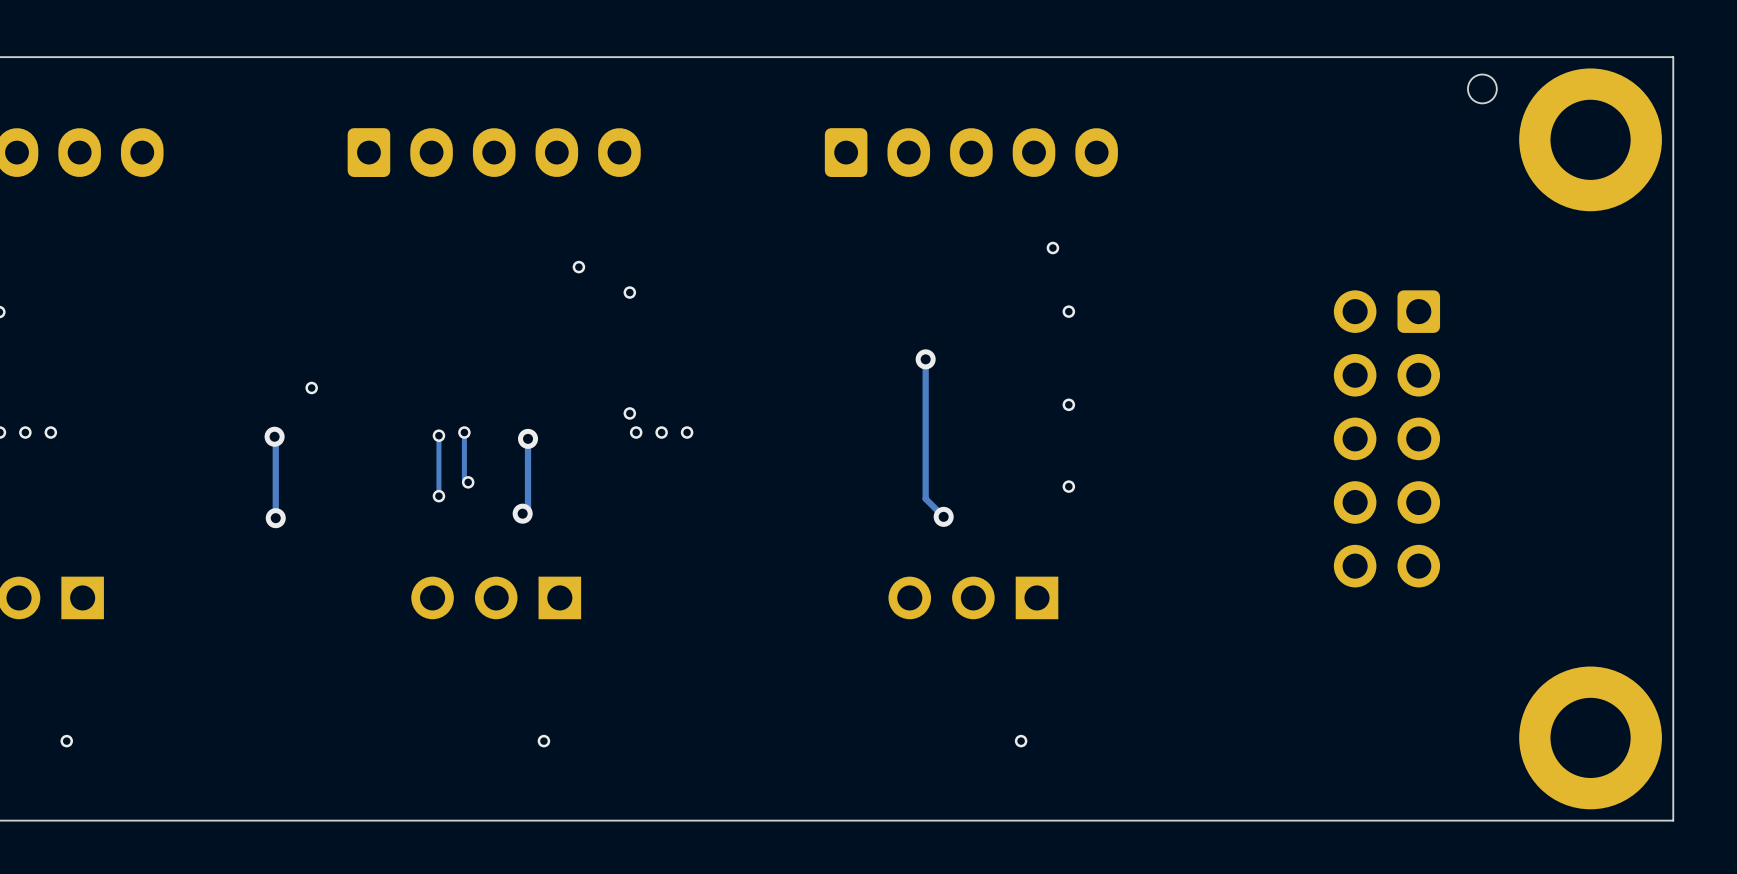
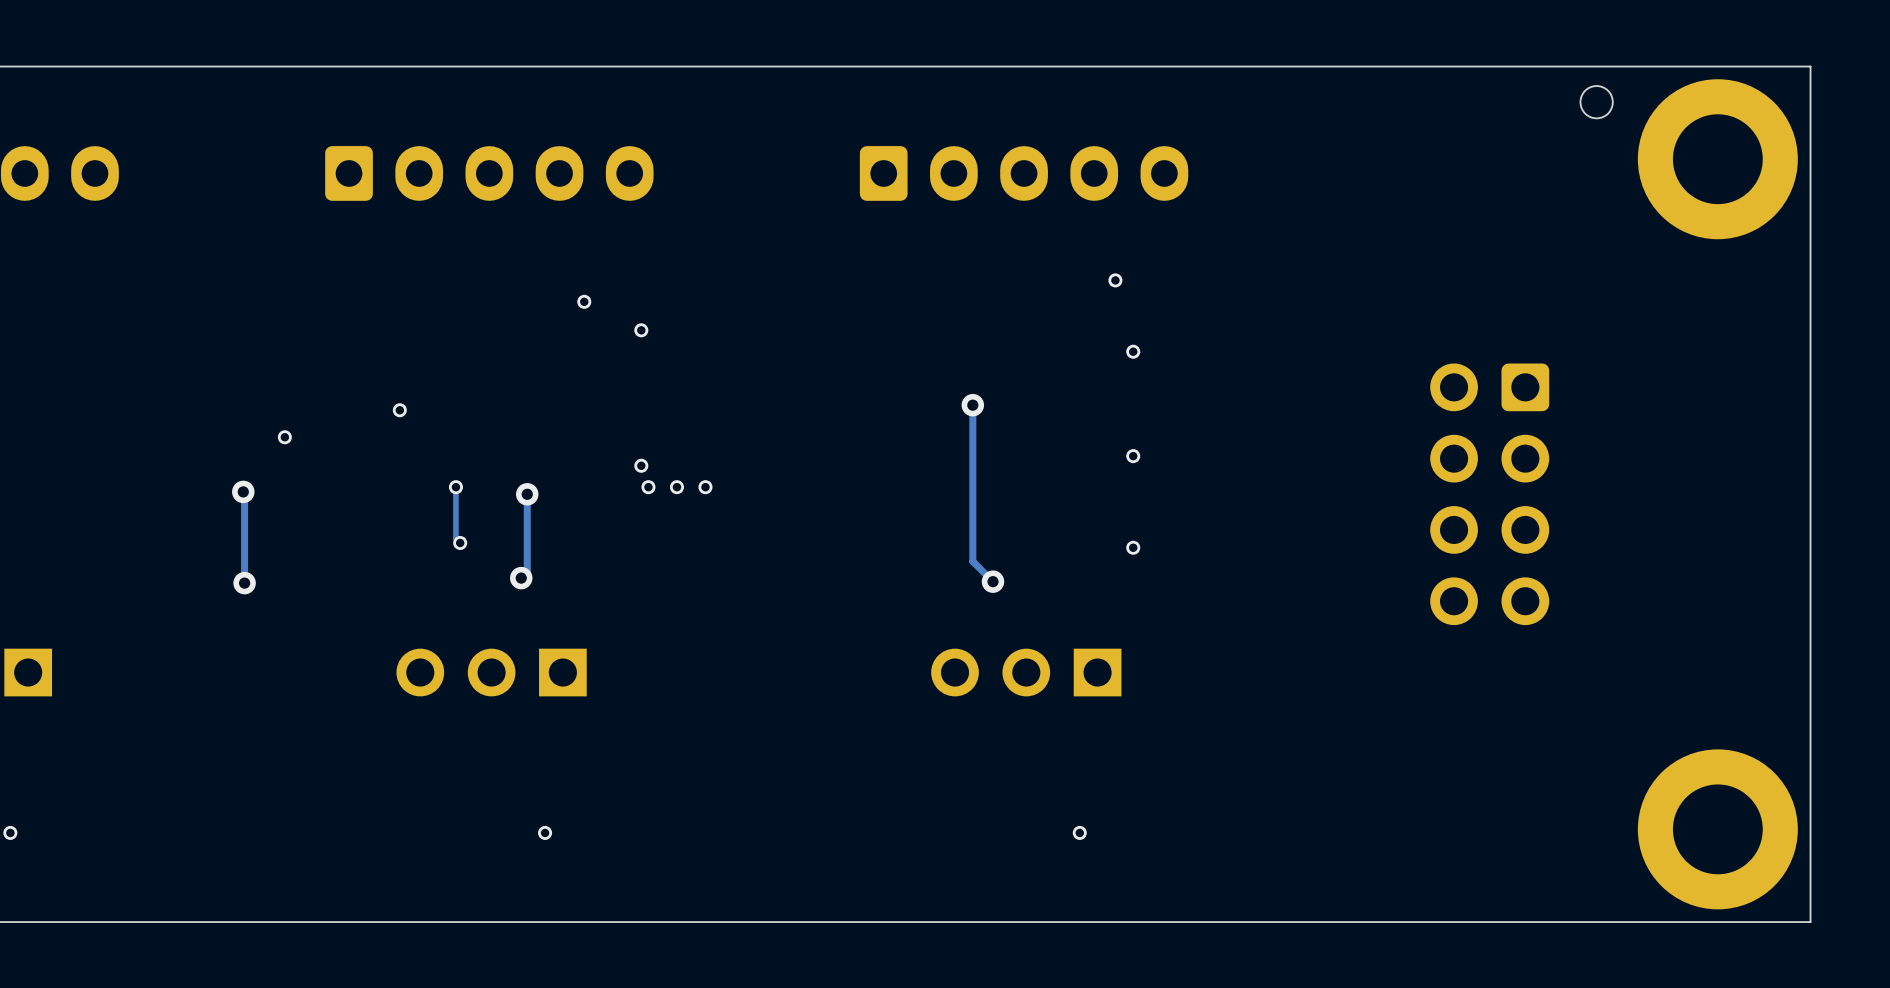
part footprint: [1333, 290, 1441, 588] -> [1430, 363, 1550, 626]
via: none -> (399, 410)
track: (438, 435) (438, 496) -> none
via: (438, 435) -> none
via: (438, 496) -> none

